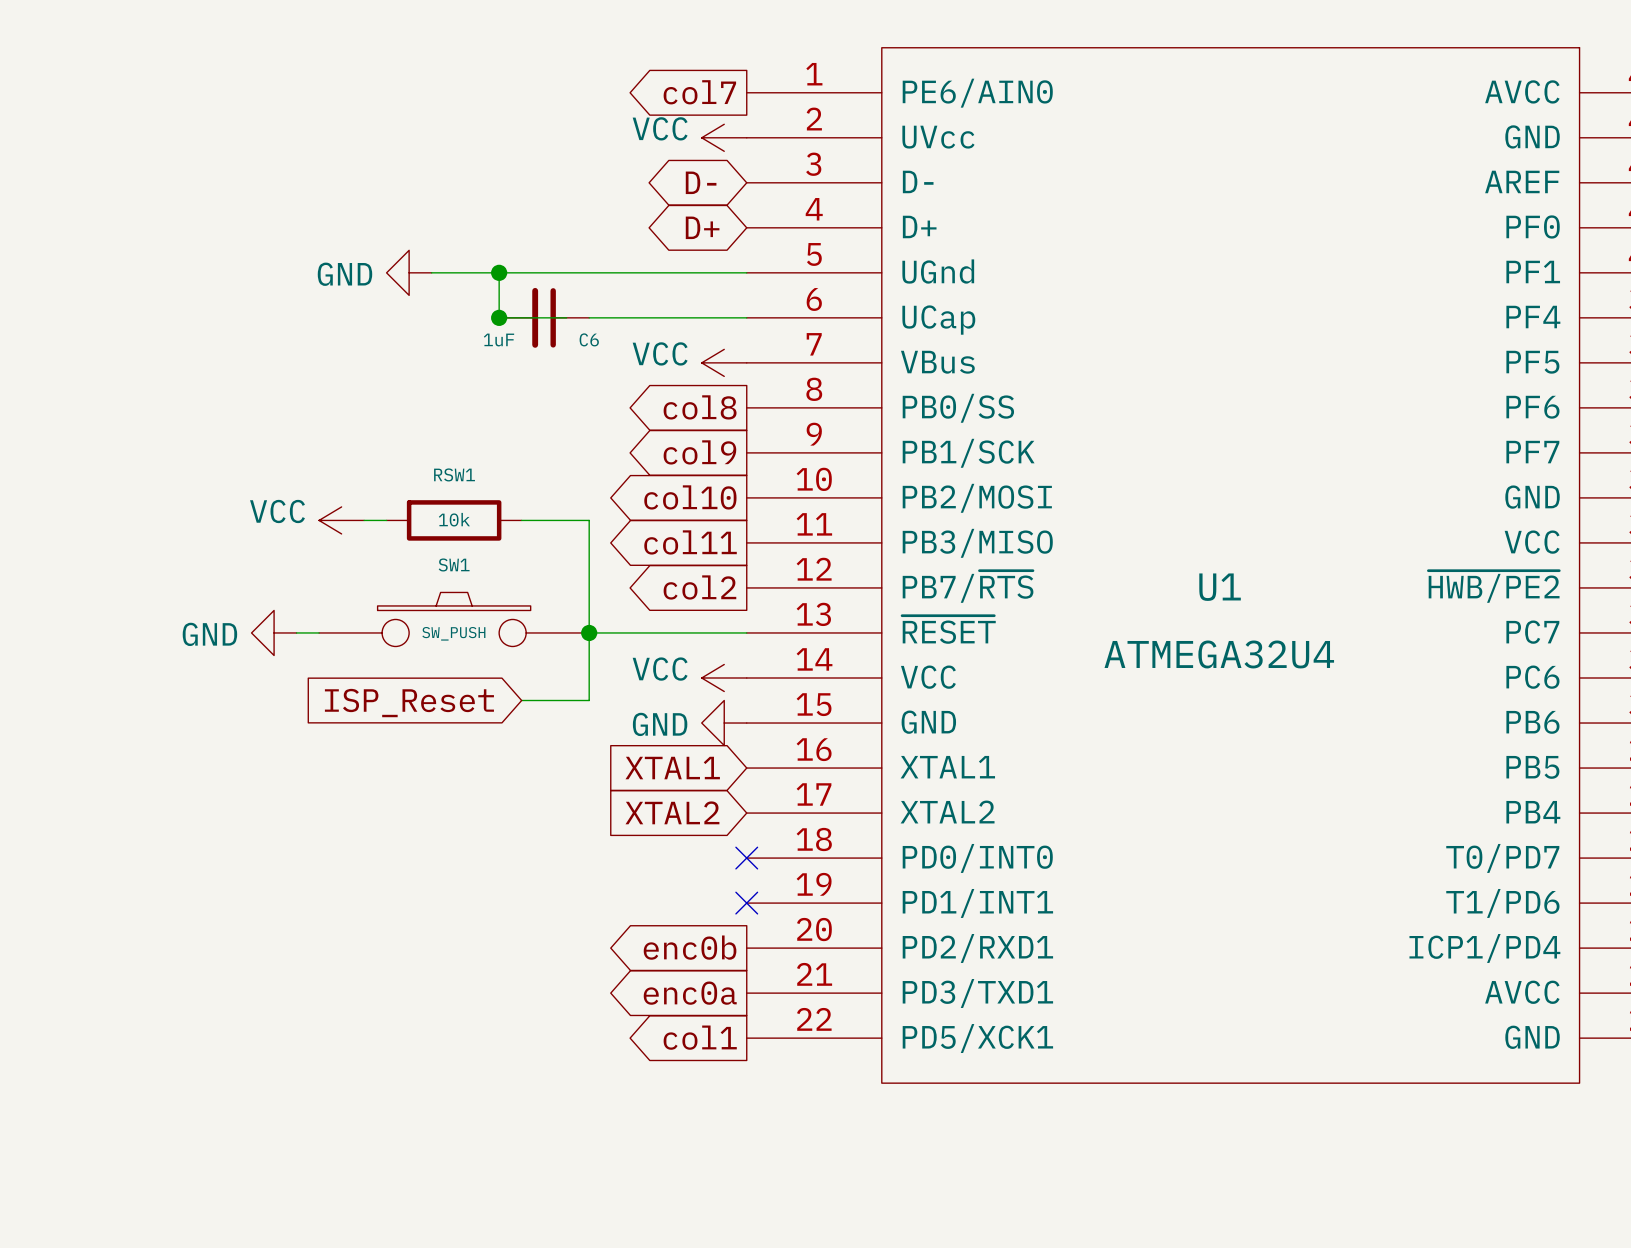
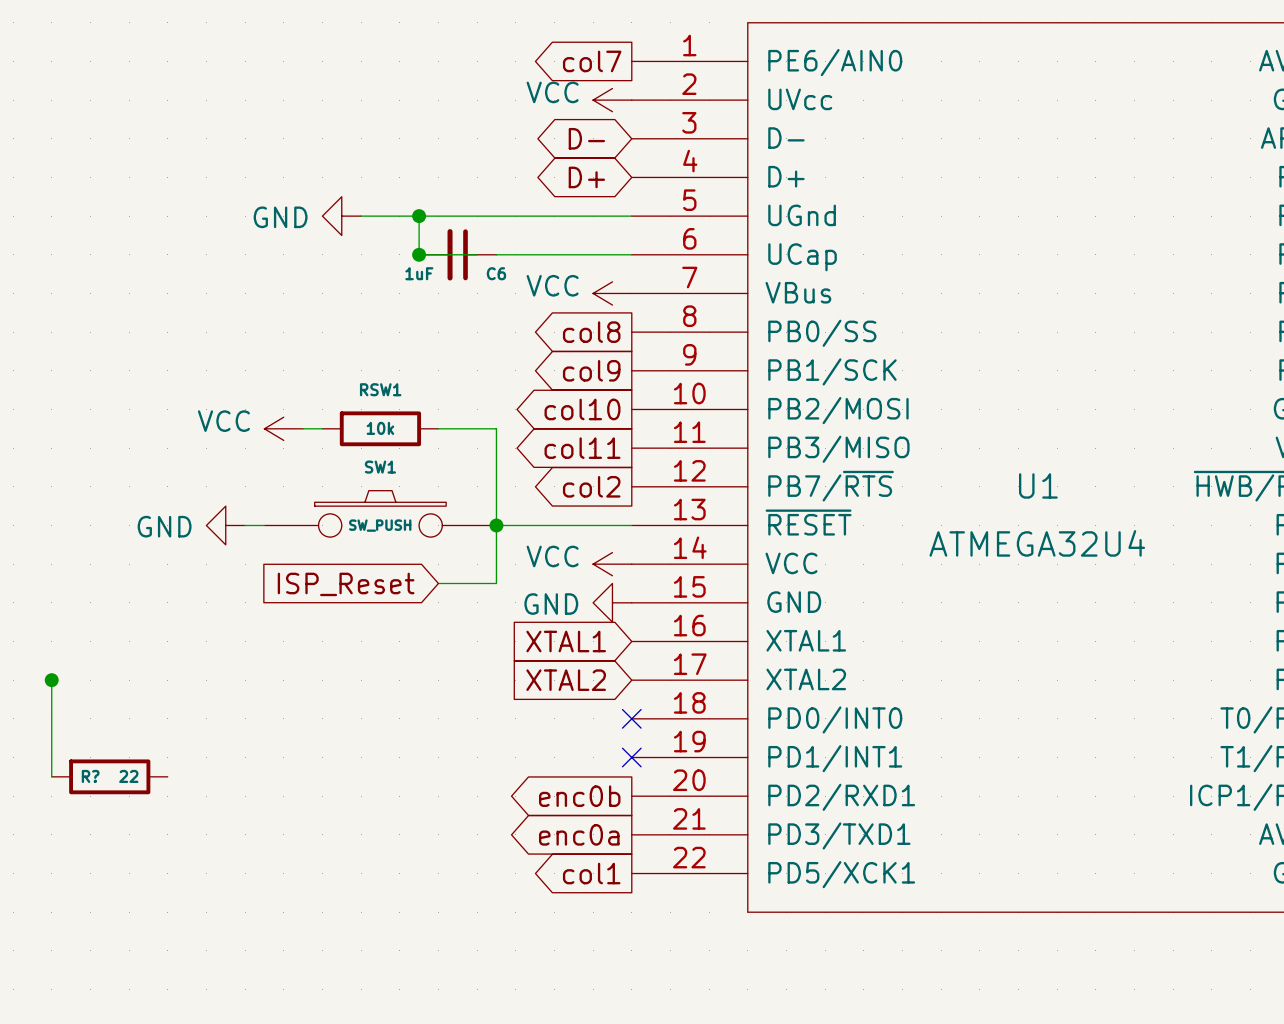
wire: none -> (51, 680) (51, 776)
junction: none -> (51, 680)
R?: none -> 22 (109, 776)

